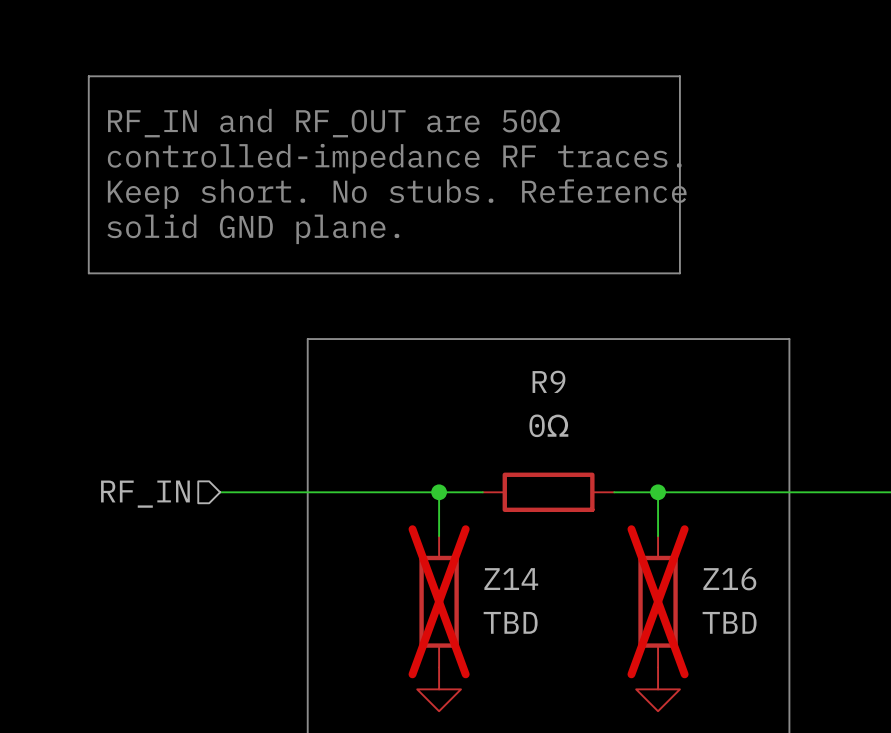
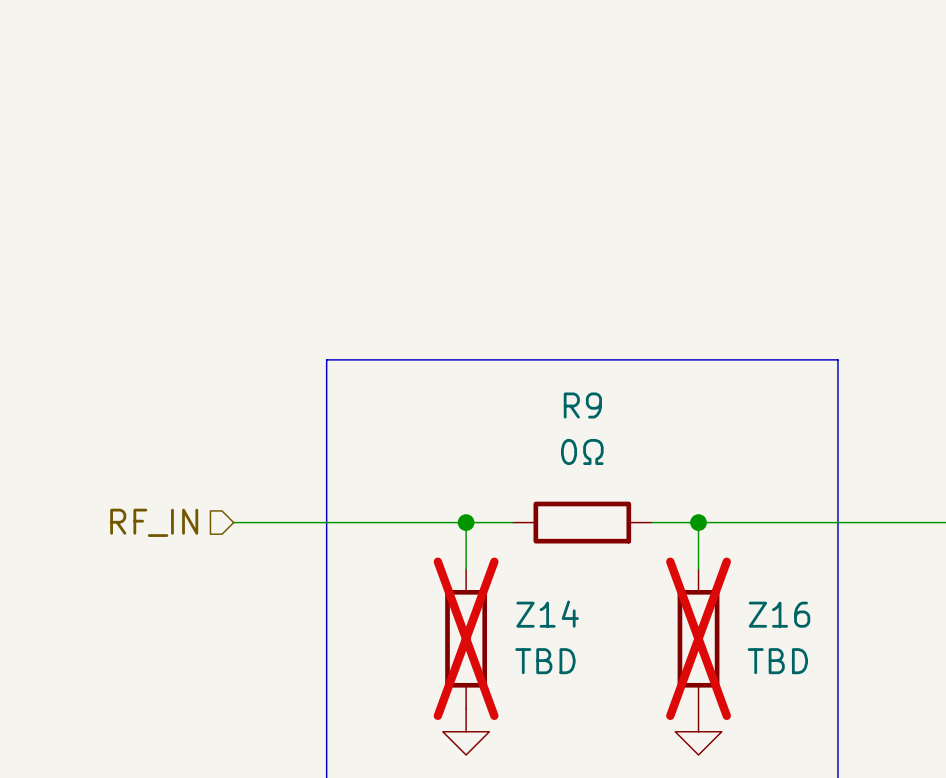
line: (88, 76) (679, 76) (679, 273) (88, 273) (88, 76) -> none
text: RF_IN and RF_OUT are 50Ω (333, 123) -> none
text: controlled-impedance RF traces. (394, 158) -> none
text: Keep short. No stubs. Reference (397, 194) -> none
text: solid GND plane. (253, 229) -> none

